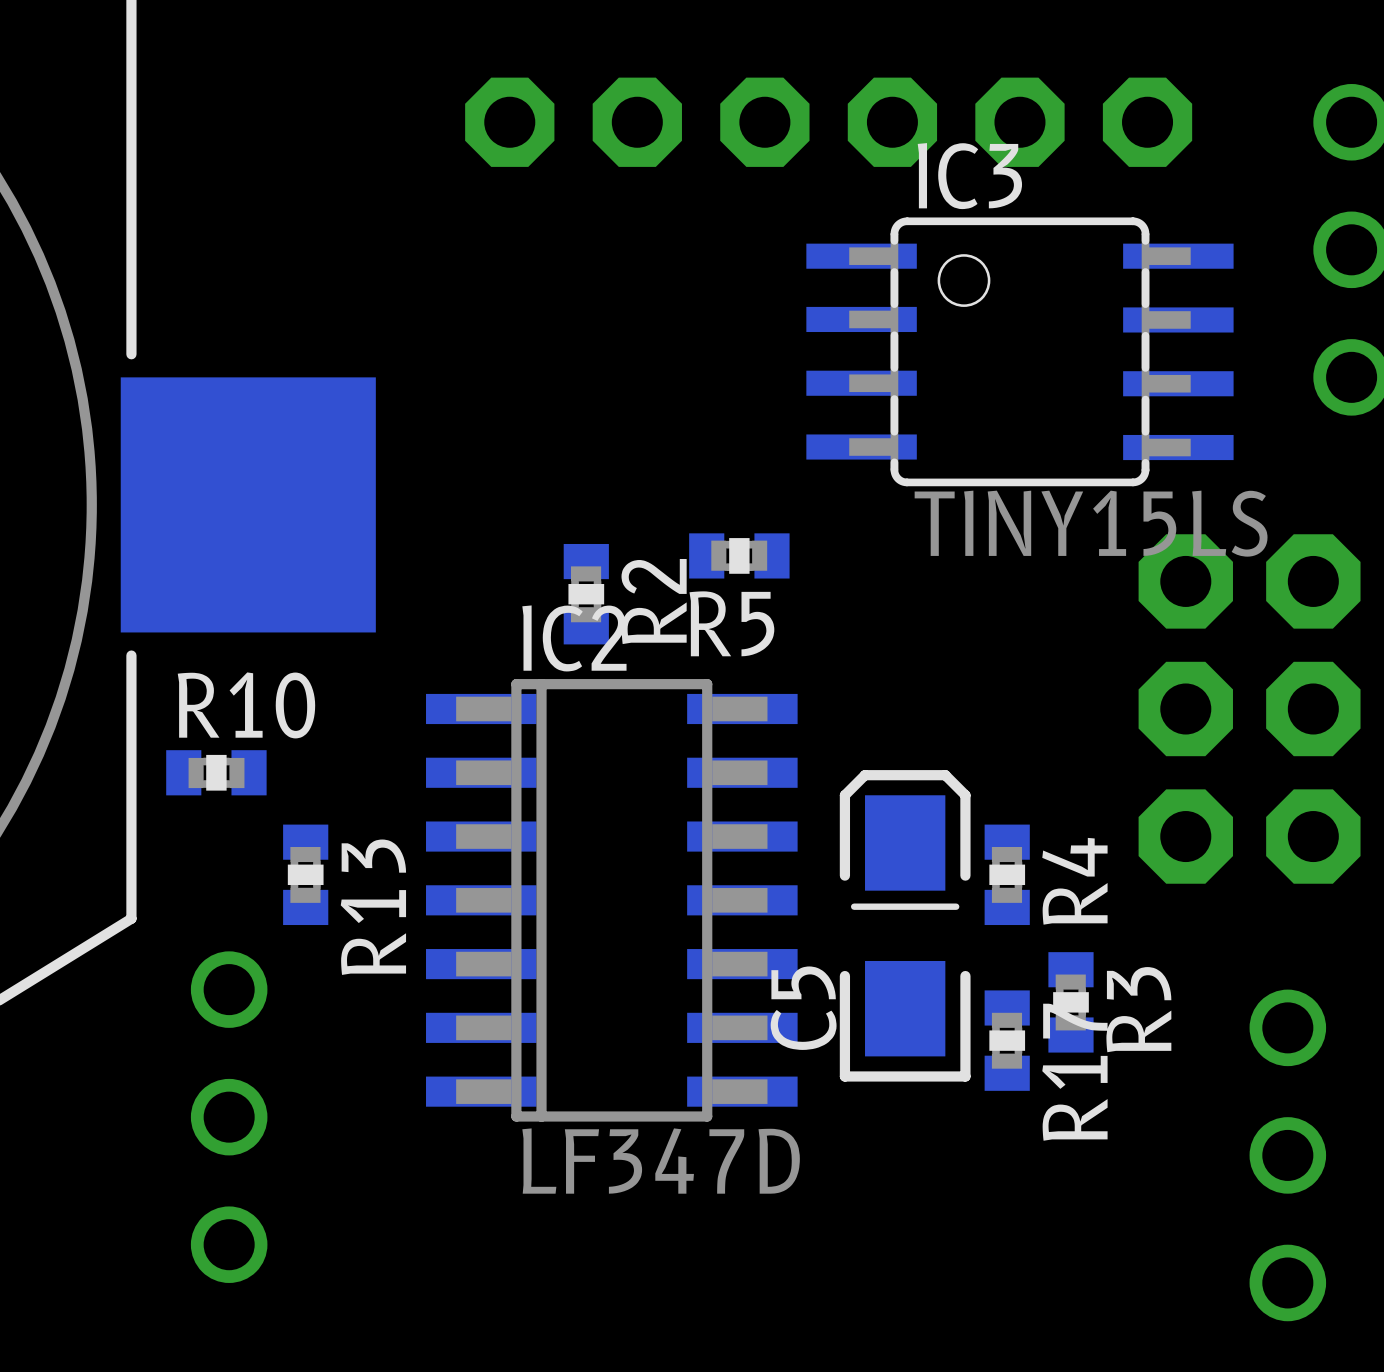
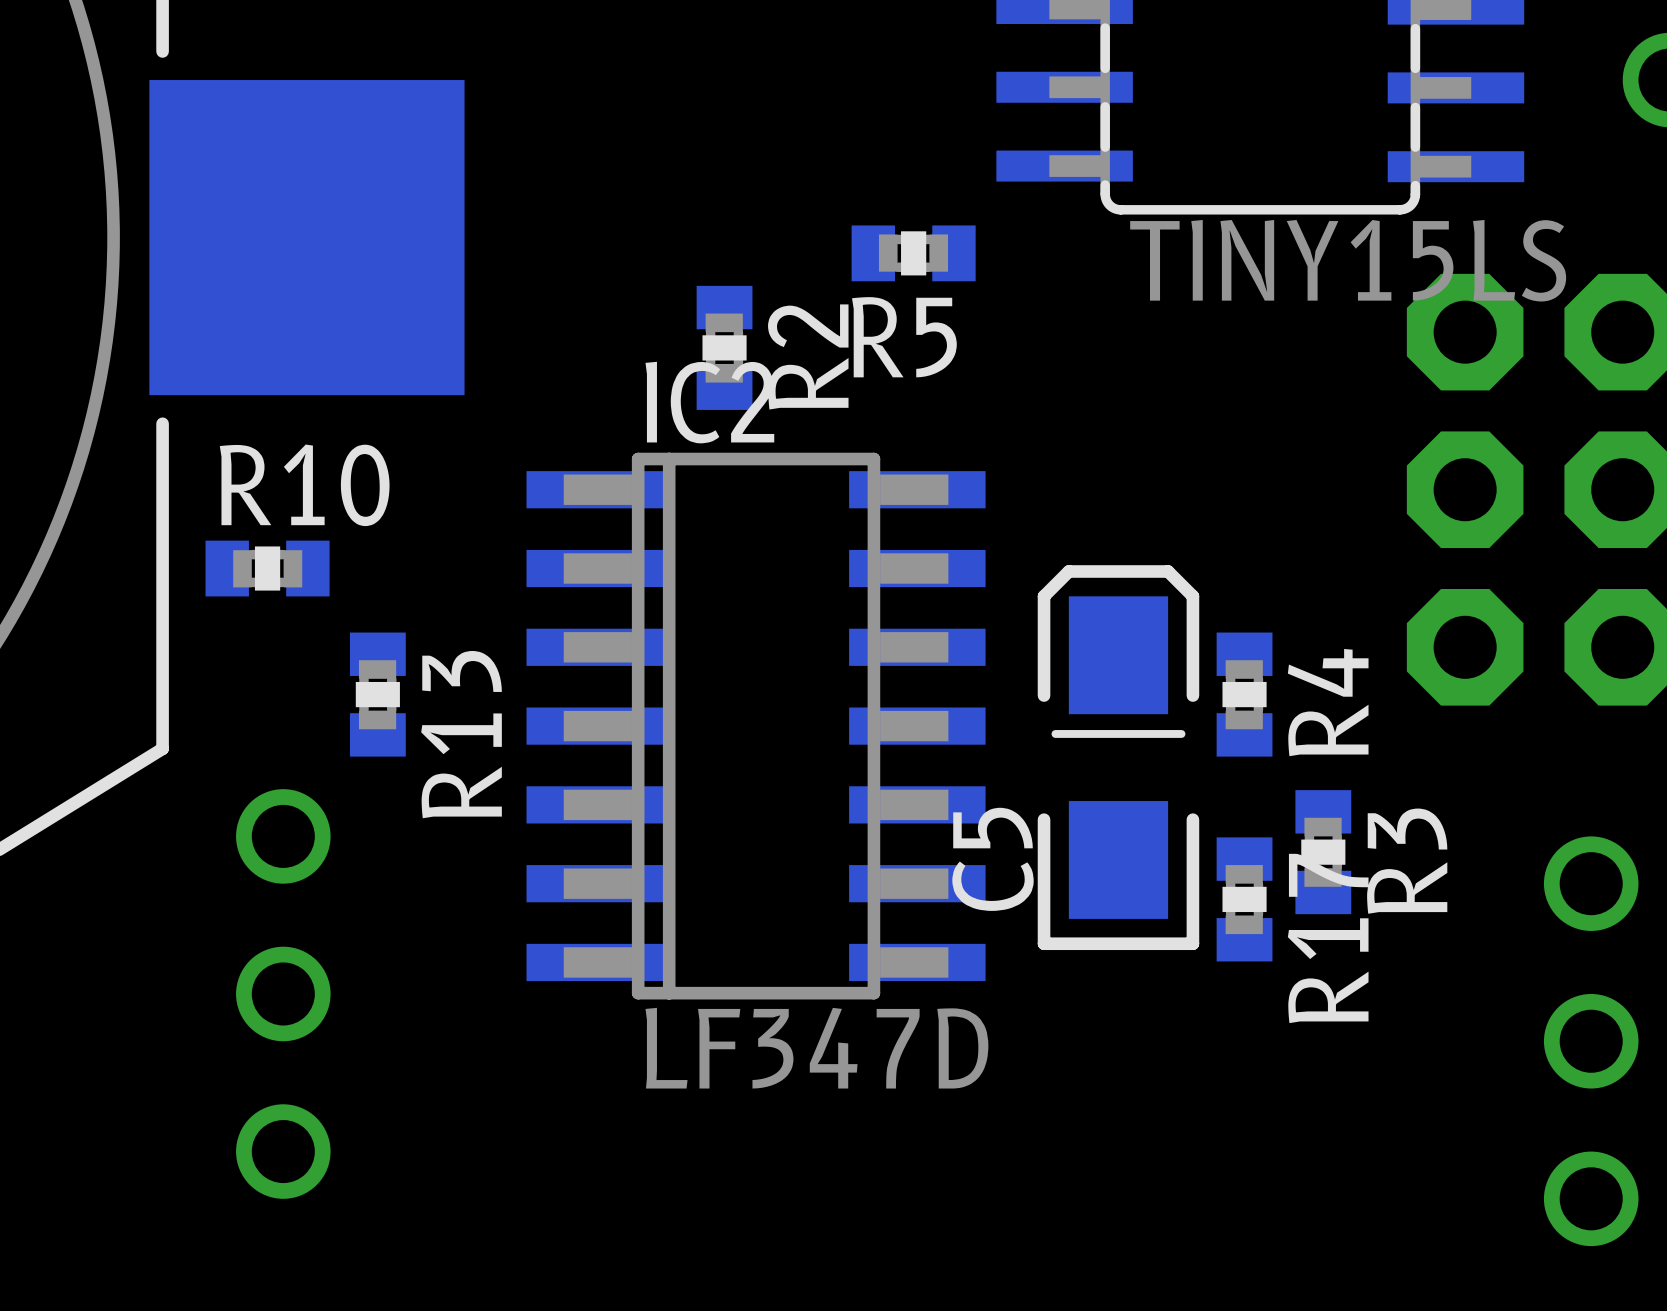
R5 position: (739, 555) -> (913, 253)

